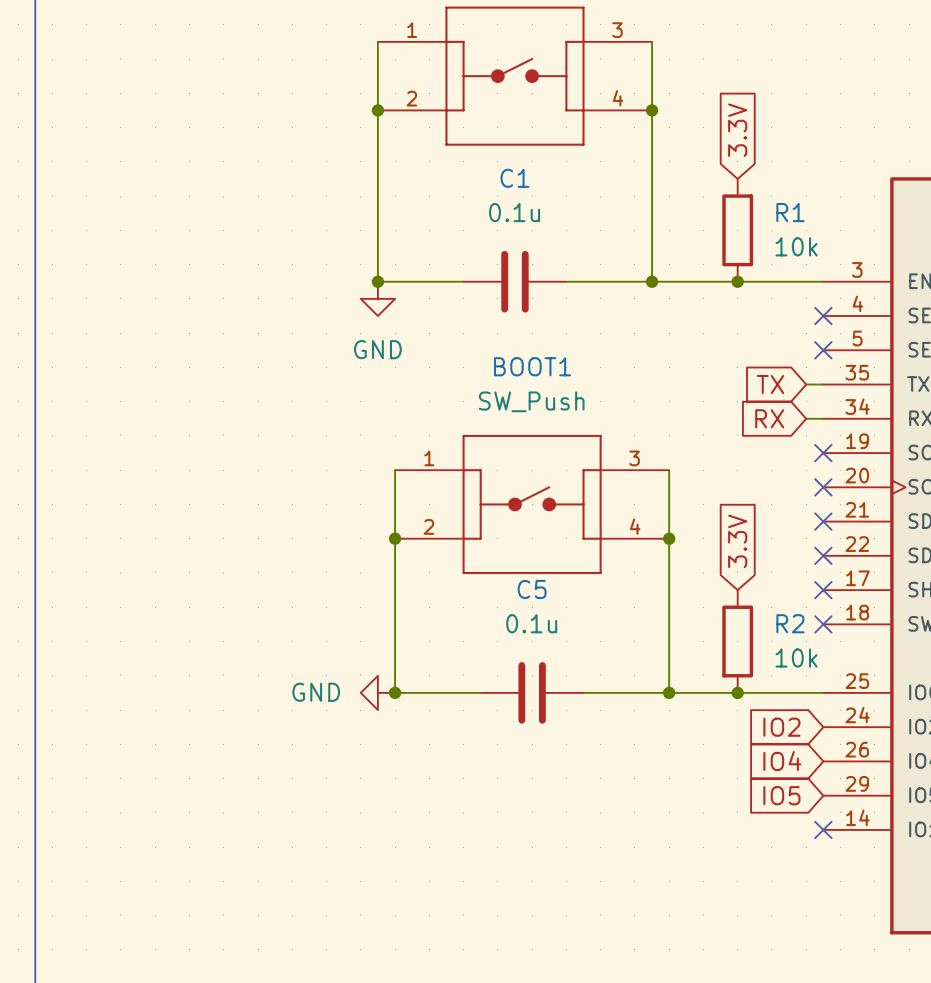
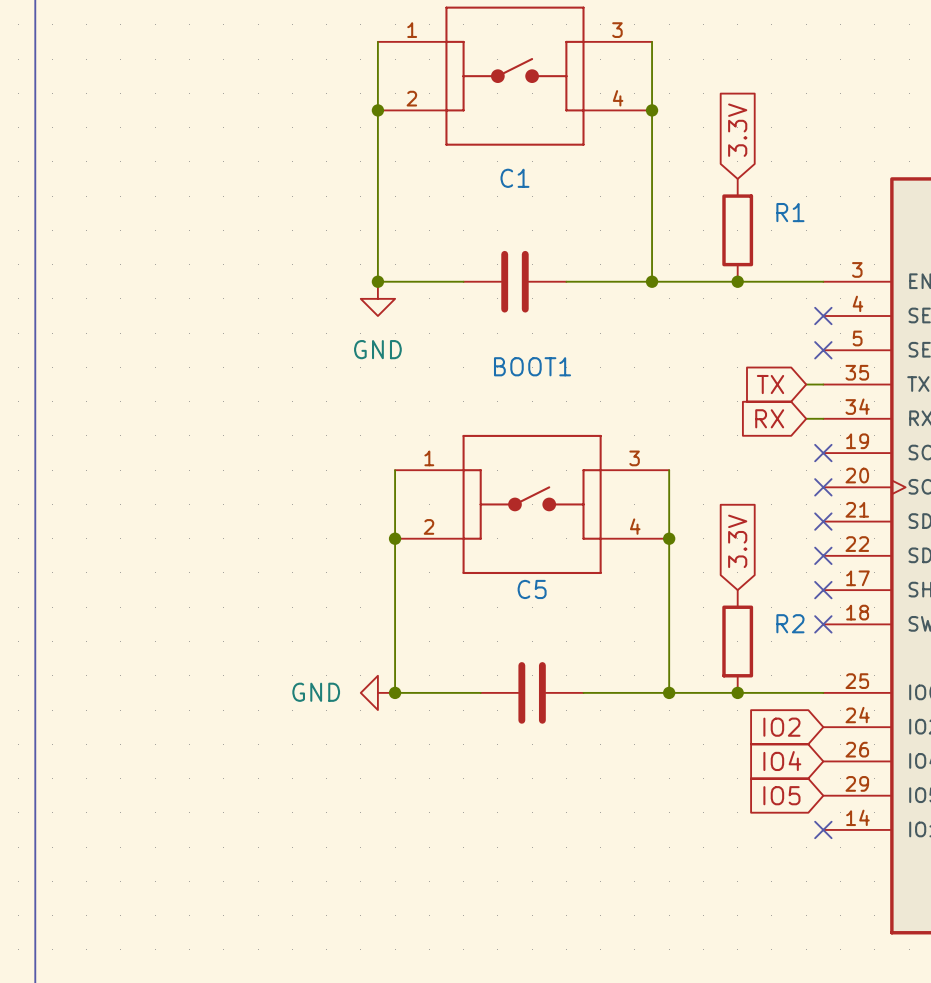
C1 value: 0.1u (514, 212) -> none
R1 value: 10k (796, 246) -> none
BOOT1 value: SW_Push (531, 401) -> none
C5 value: 0.1u (531, 623) -> none
R2 value: 10k (796, 658) -> none

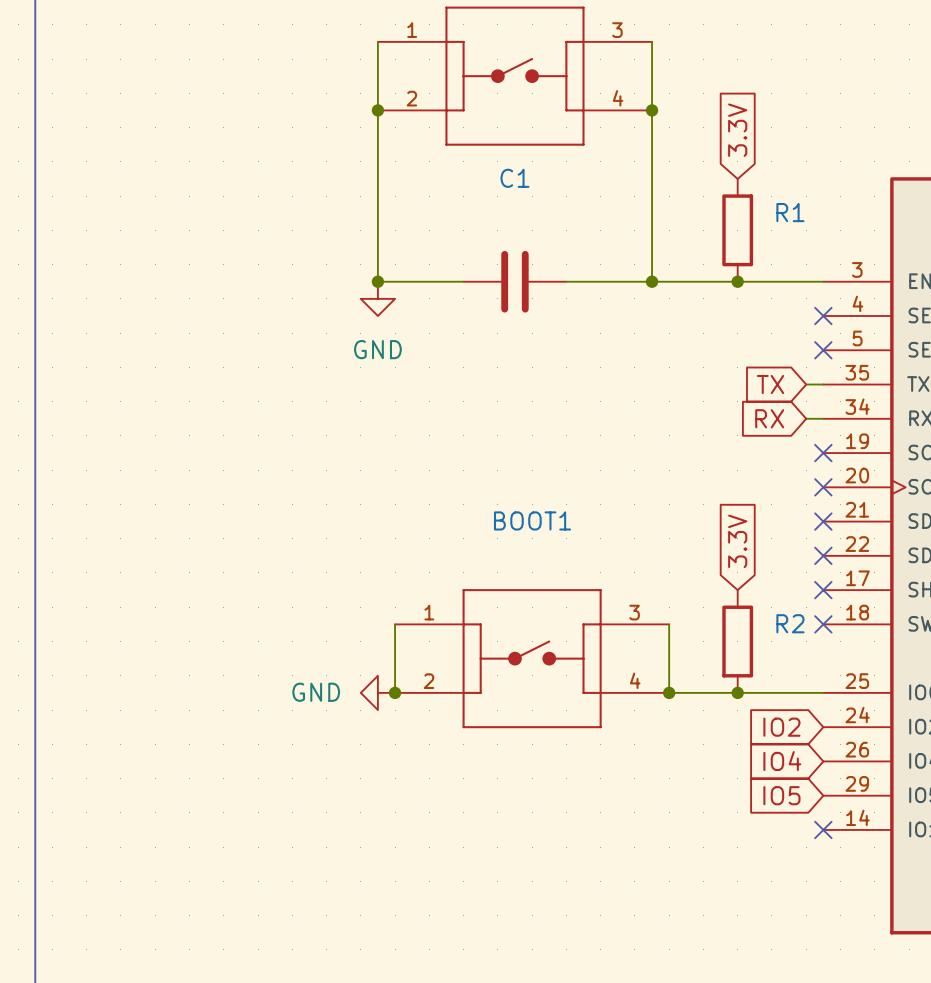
wire: (395, 470) (395, 624) -> none
wire: (669, 470) (669, 624) -> none
BOOT1 position: (532, 504) -> (532, 658)
junction: (395, 538) -> none
junction: (669, 538) -> none
C5: (532, 692) -> none

